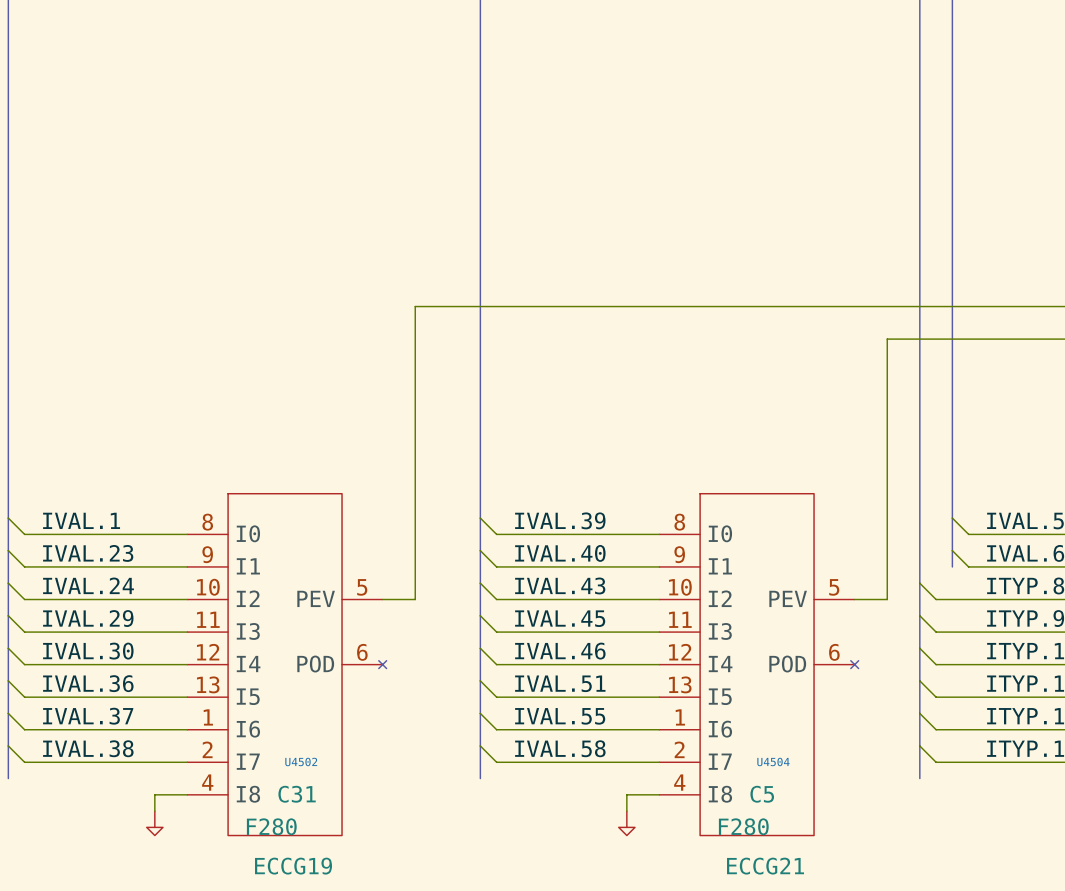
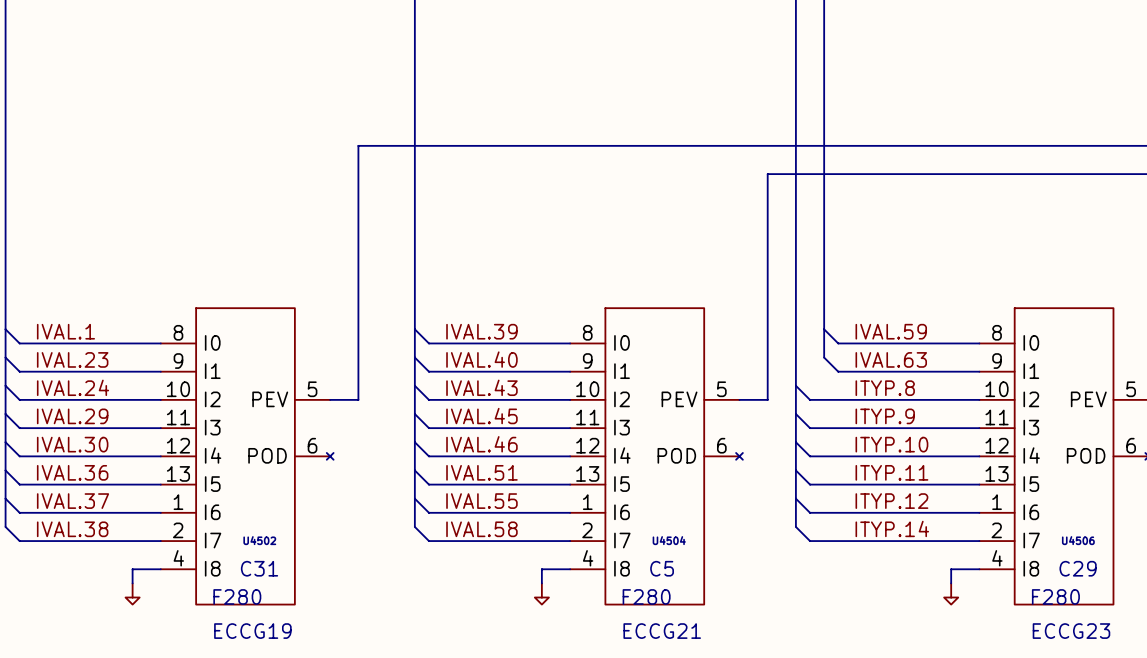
bus: (952, 550) (952, 566) -> none
bus: (8, 746) (8, 778) -> none
bus: (480, 746) (480, 778) -> none
bus: (919, 746) (919, 778) -> none

